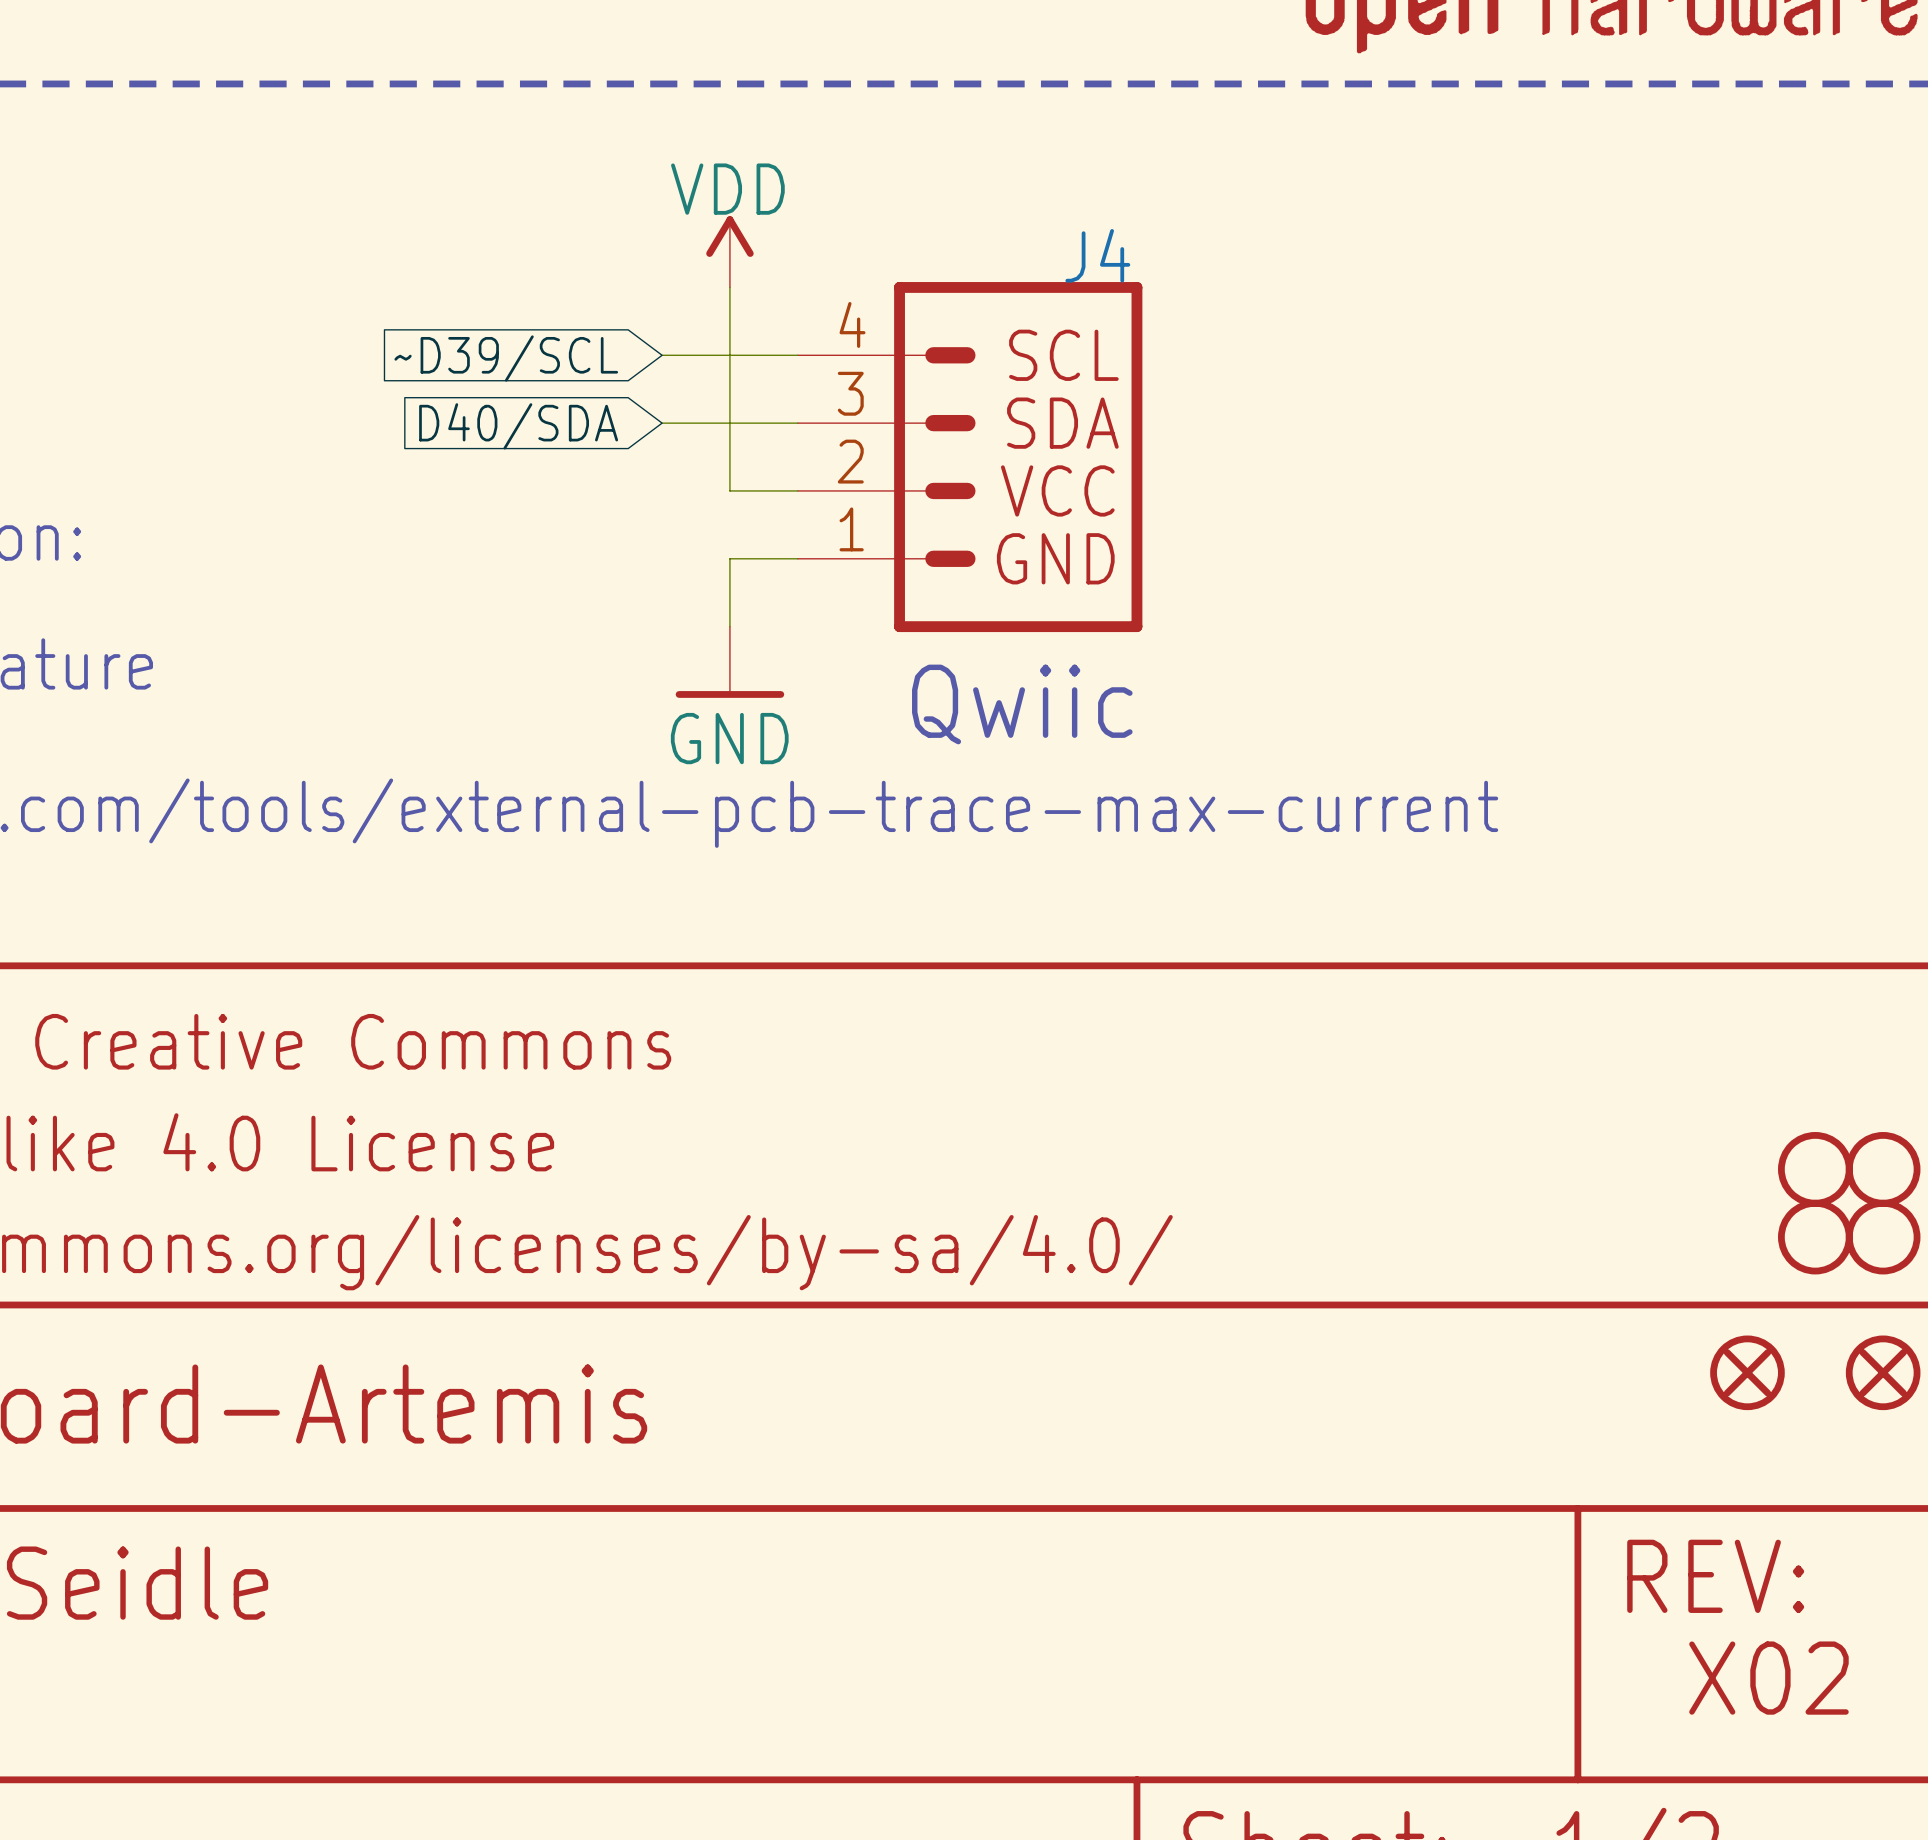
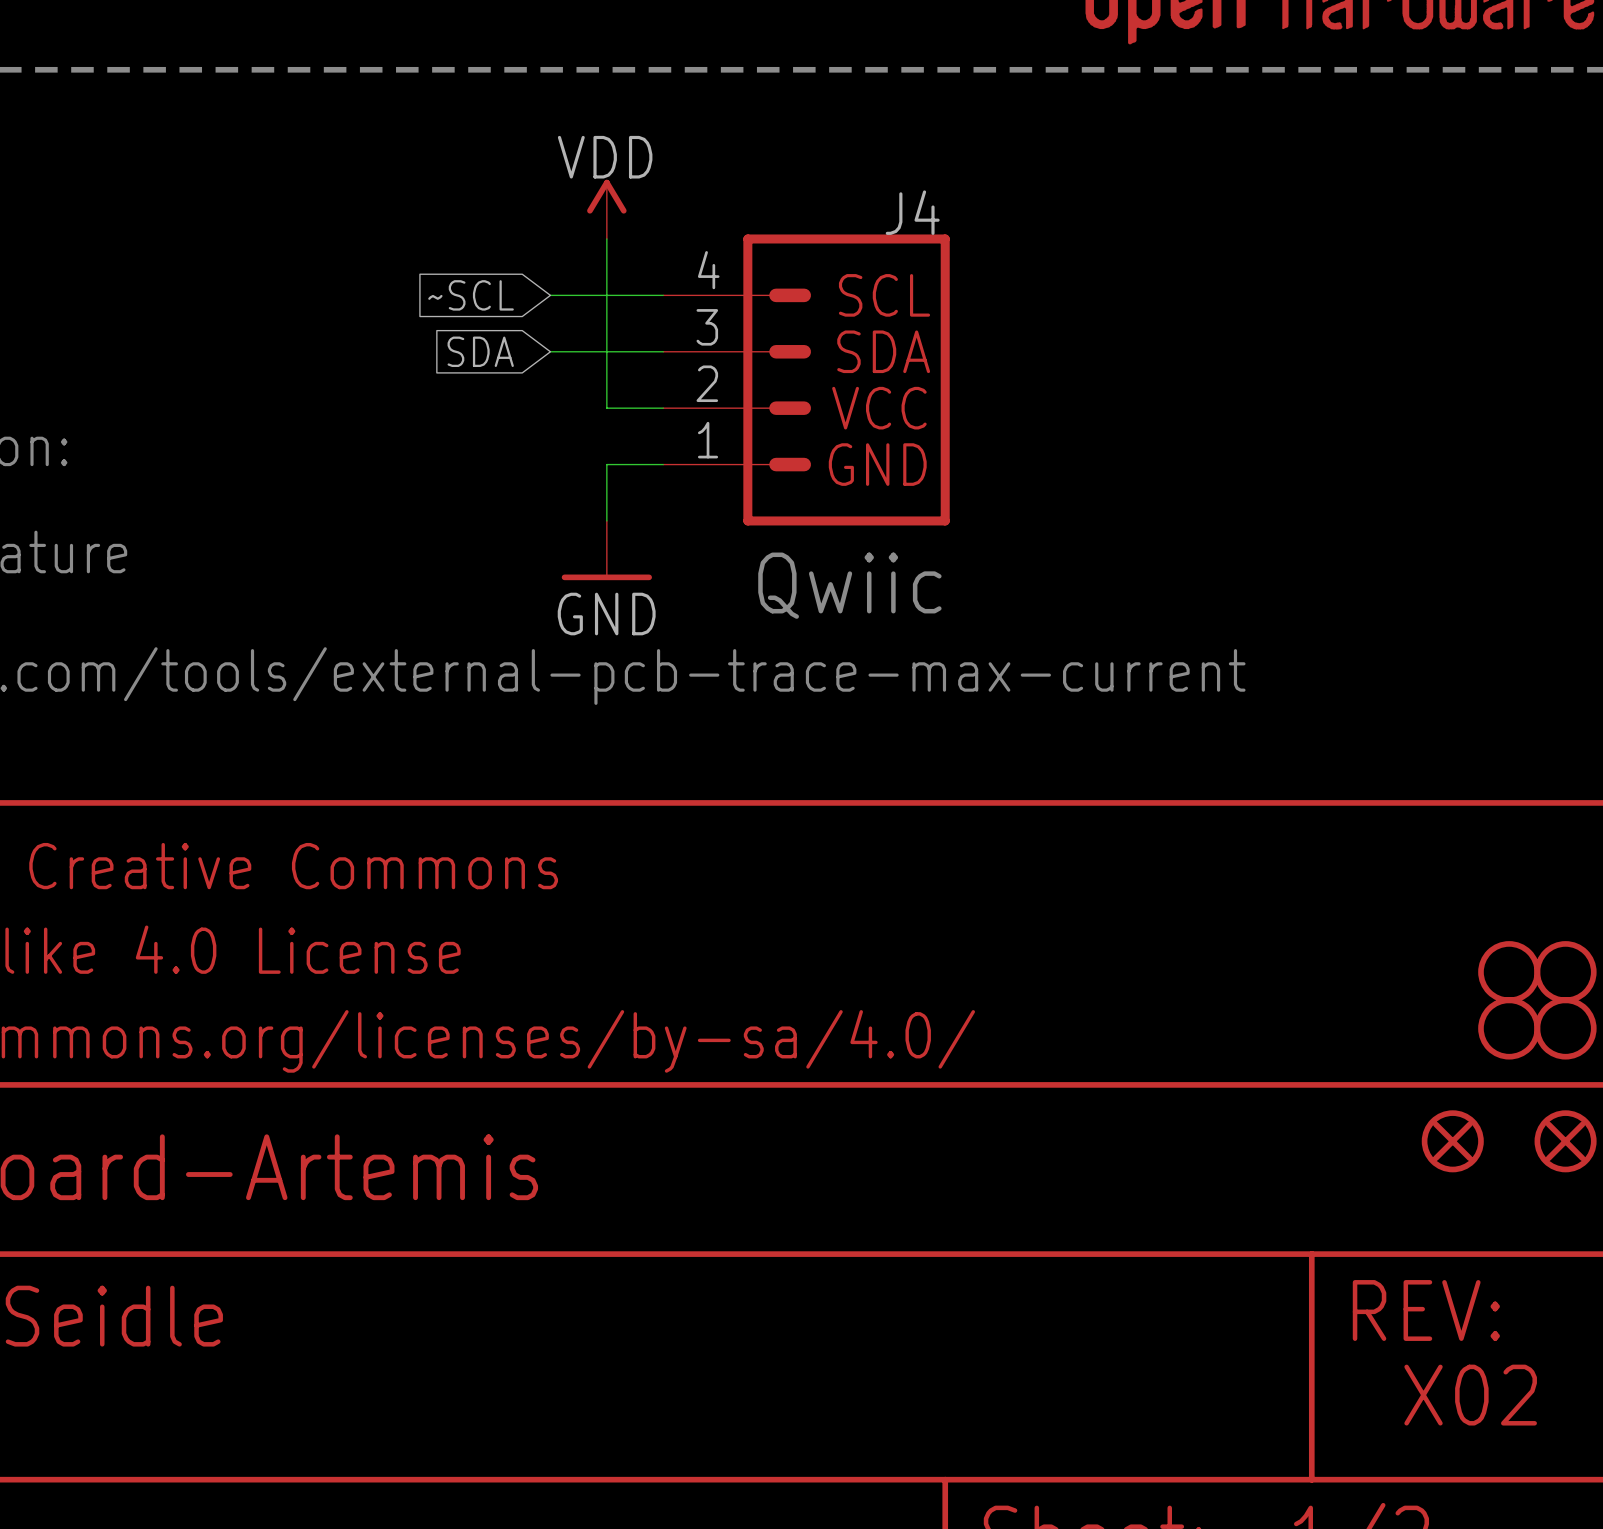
global label: ~D39/SCL (506, 358) -> ~SCL (471, 295)
global label: D40/SDA (518, 426) -> SDA (480, 351)

